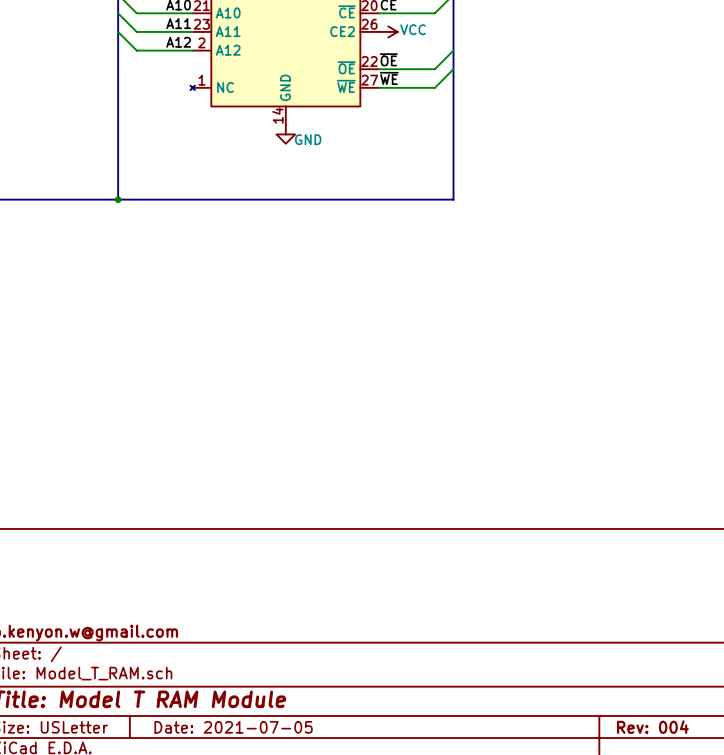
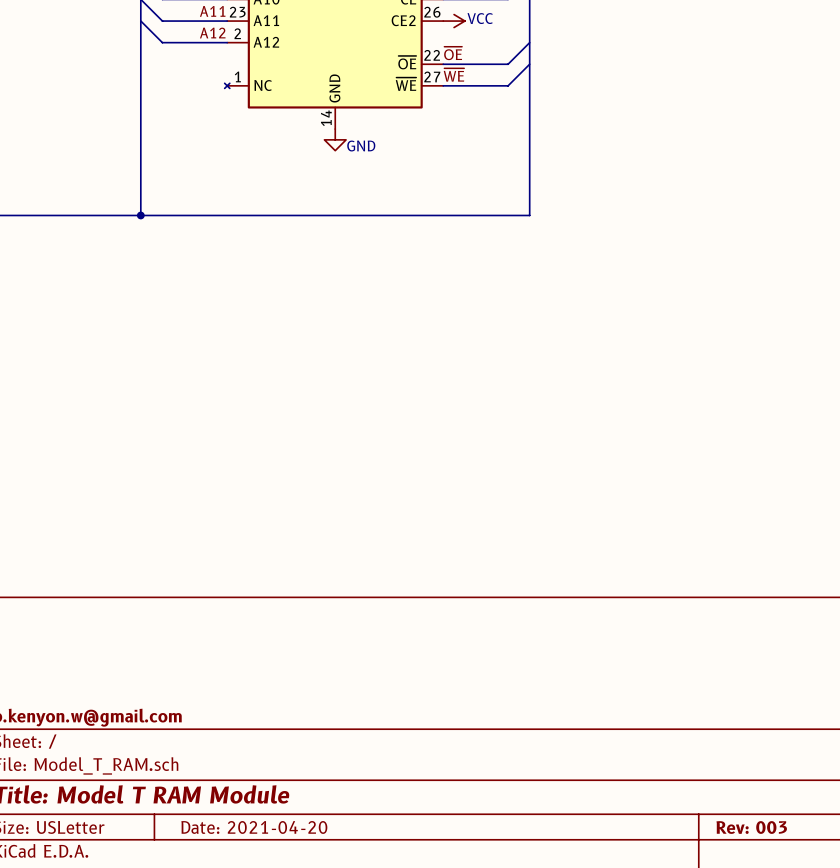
title block: Date: 2021-07-05 (233, 727) -> Date: 2021-04-20 (254, 827)
title block: Rev: 004 (652, 727) -> Rev: 003 (751, 827)

